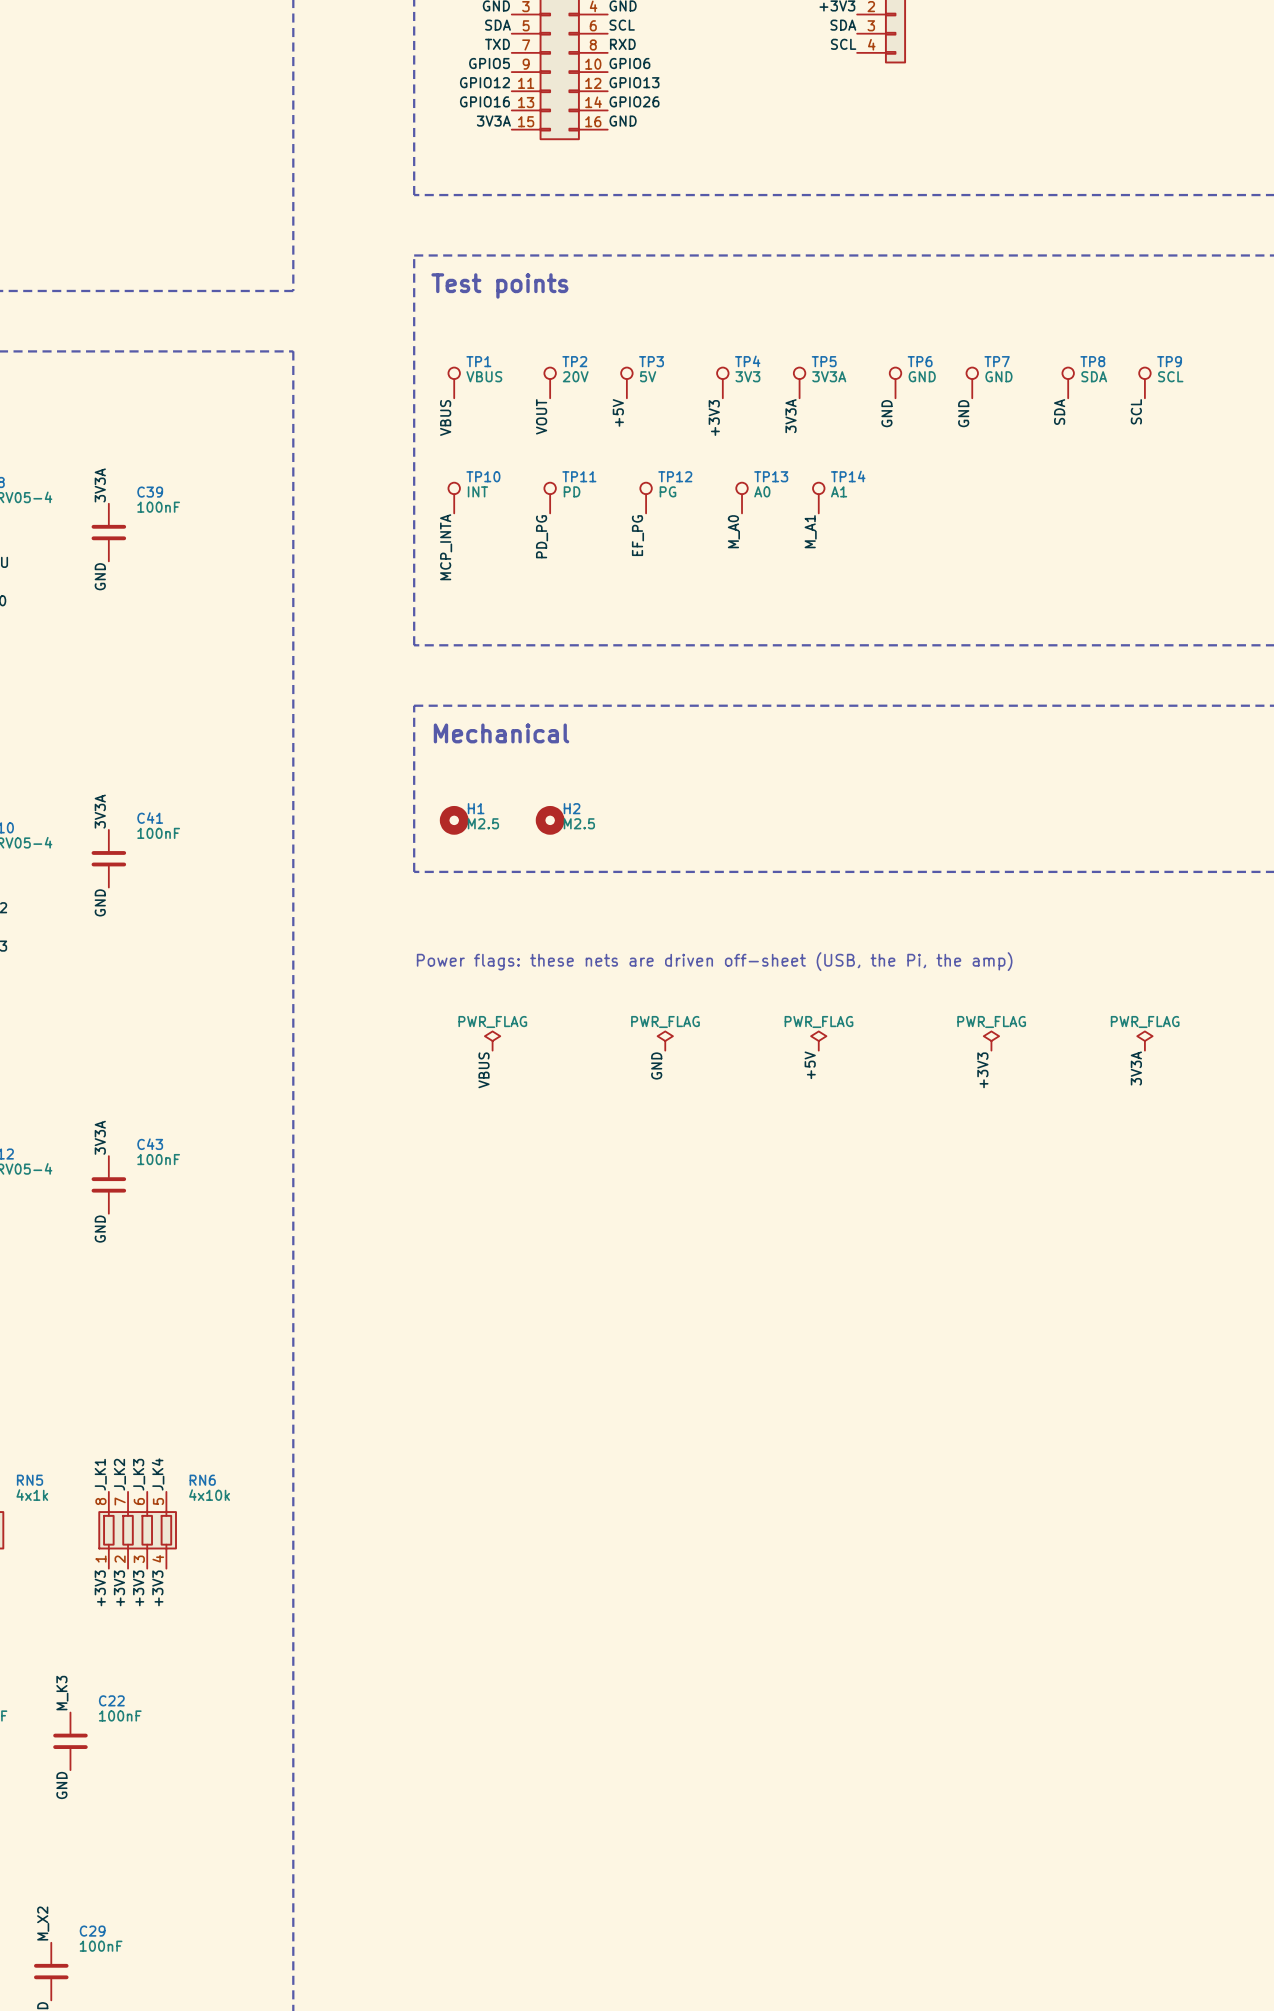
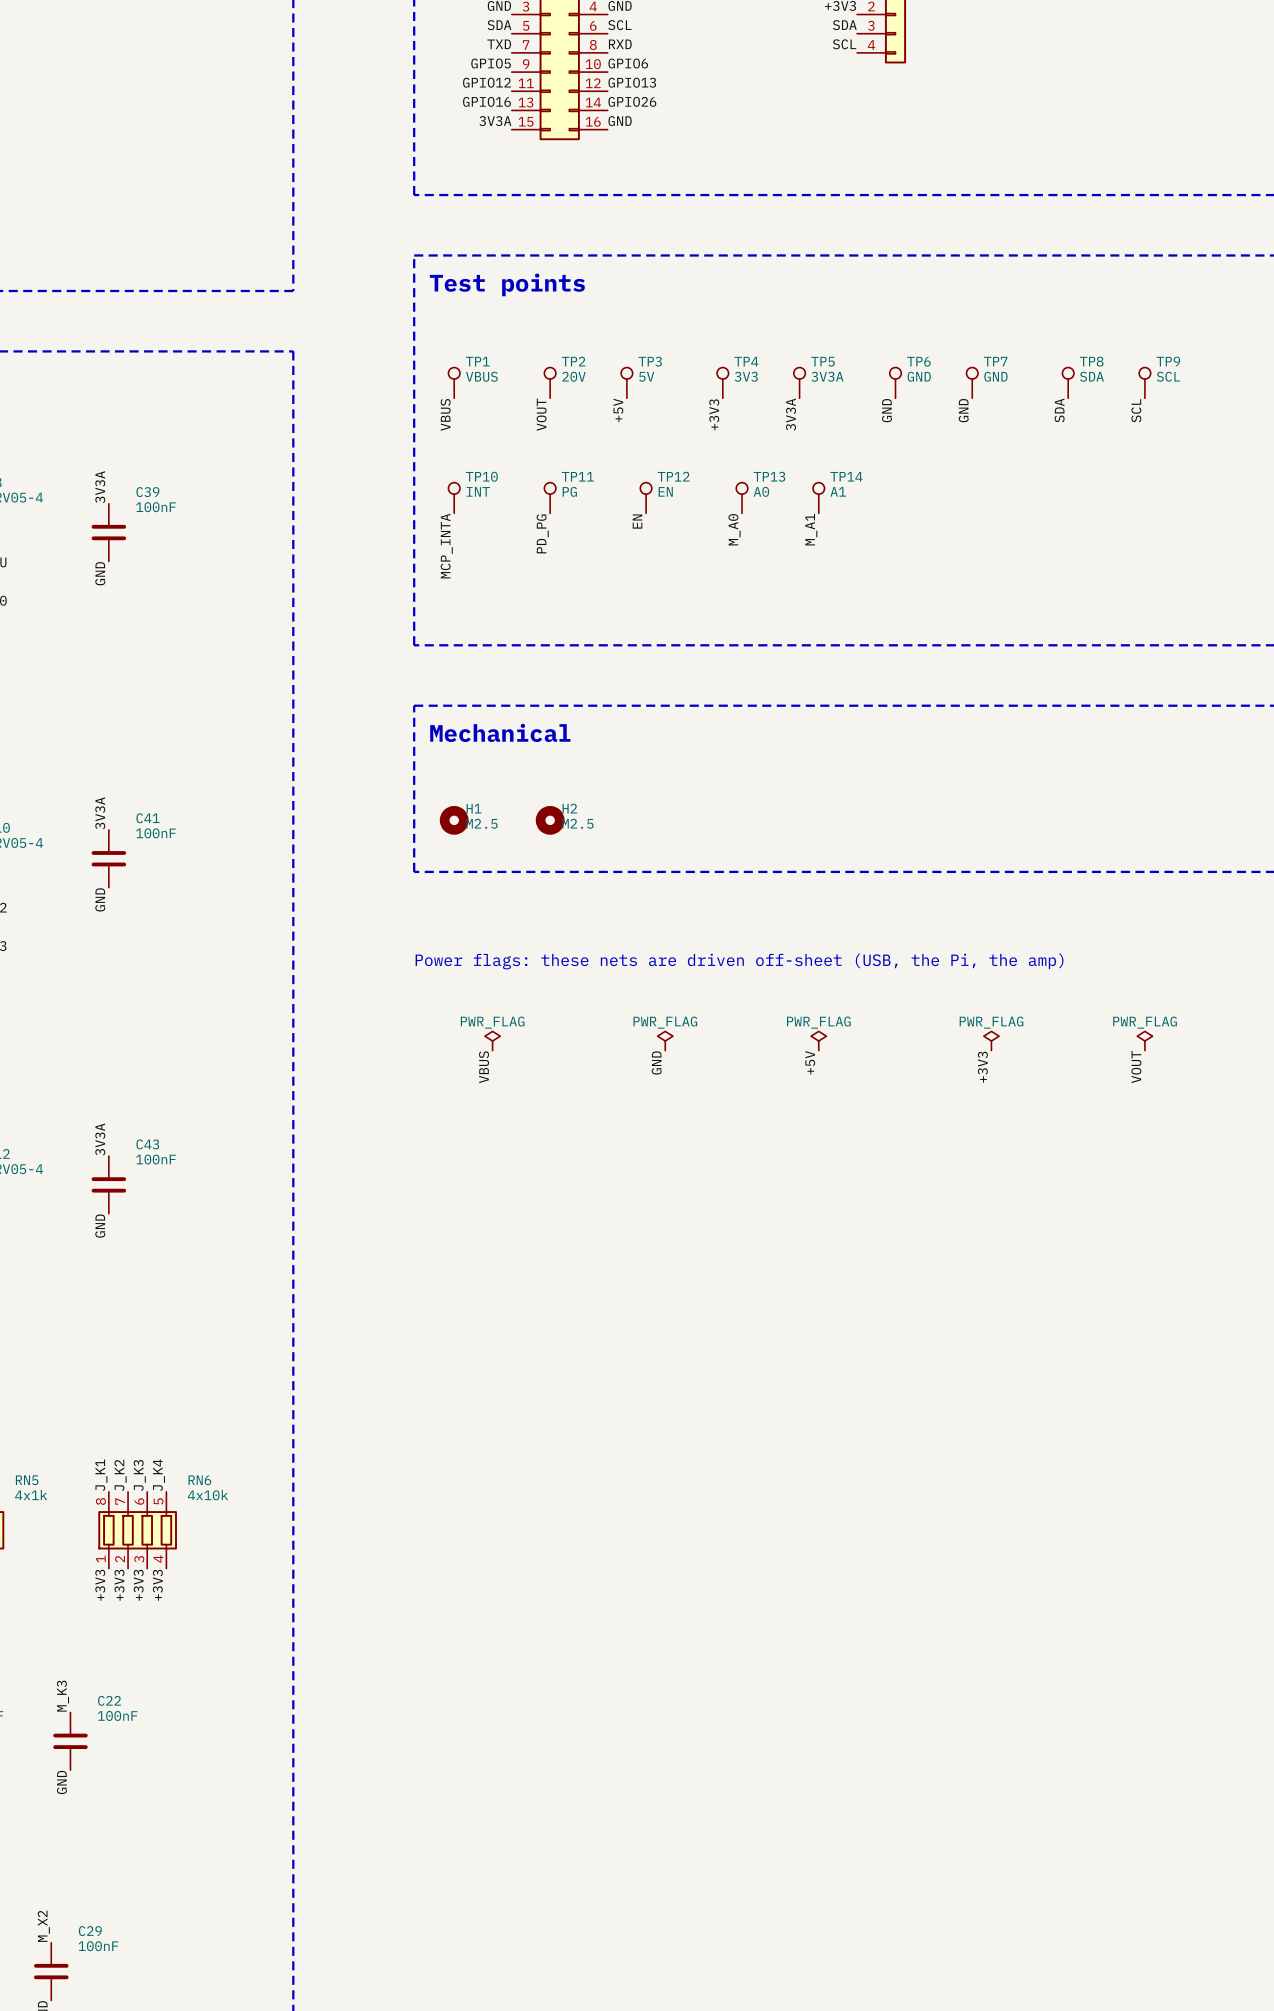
TP11 value: PD (572, 491) -> PG (569, 491)
TP12 value: PG (667, 491) -> EN (665, 491)
label: EF_PG (637, 535) -> EN (637, 521)
label: 3V3A (1136, 1068) -> VOUT (1136, 1067)

